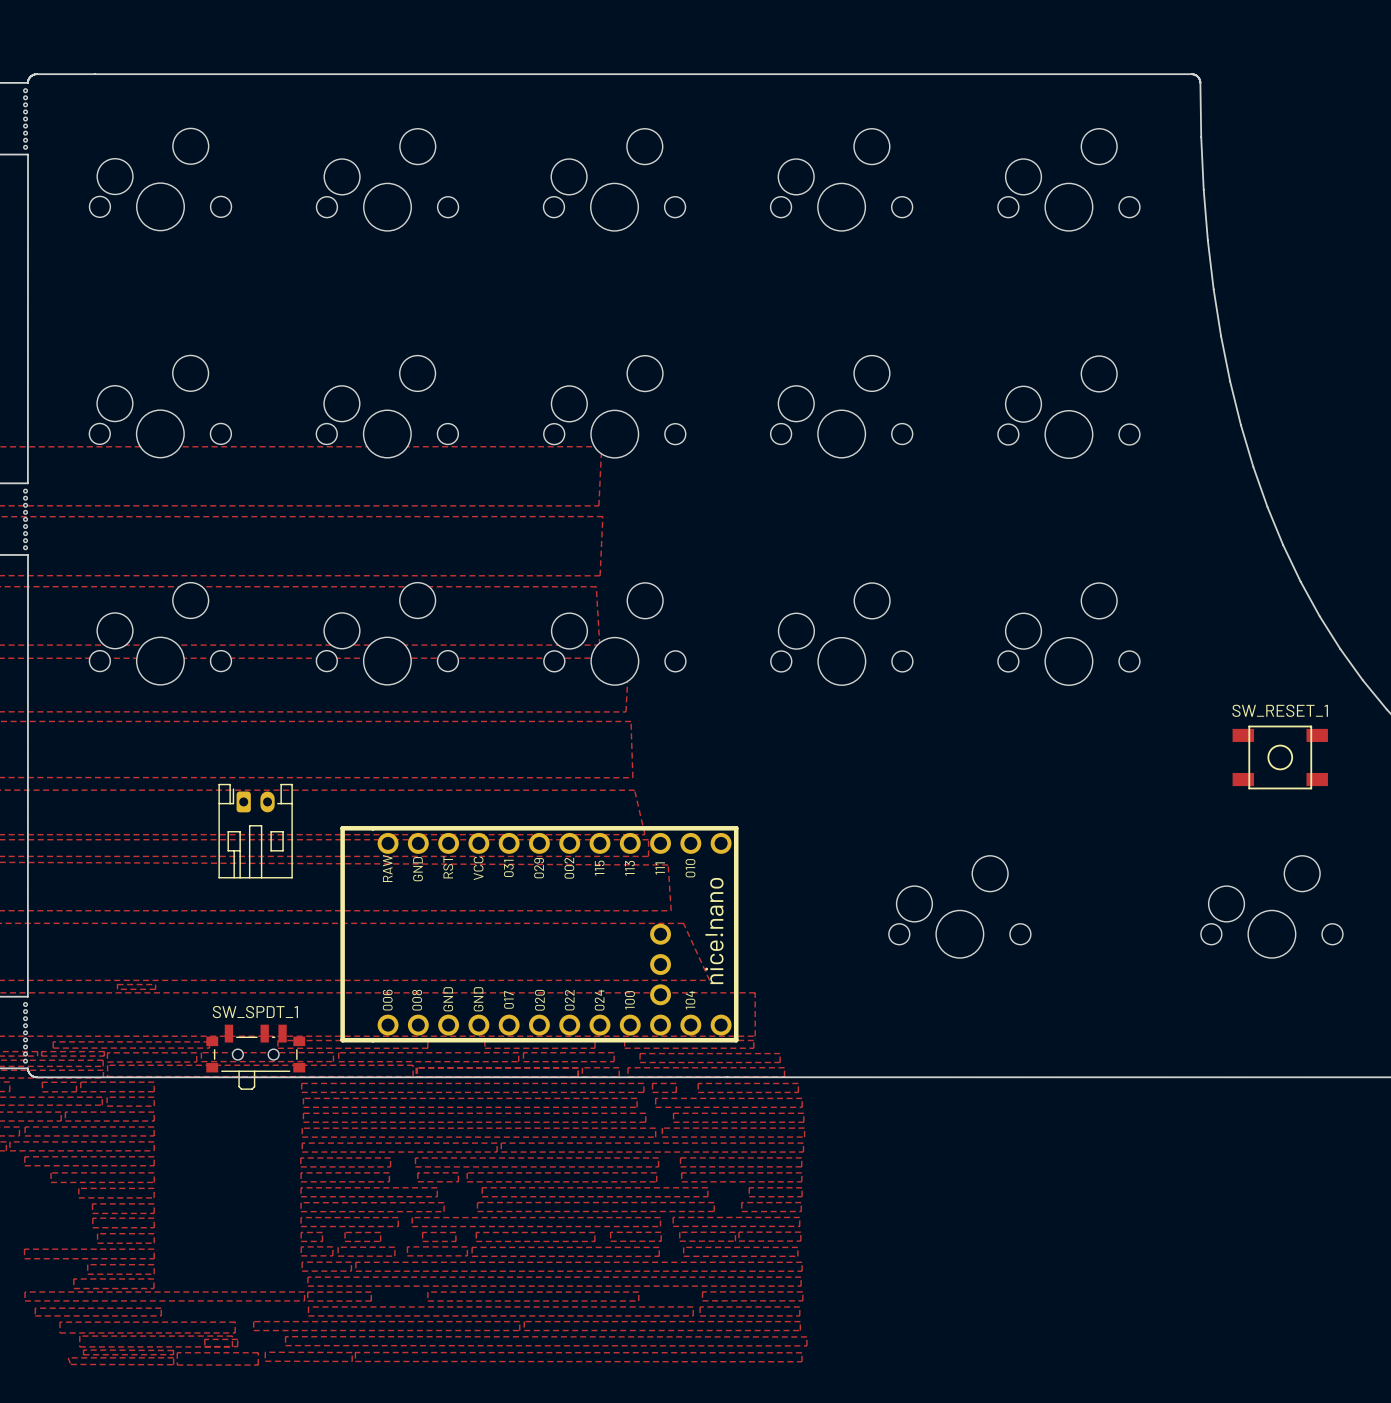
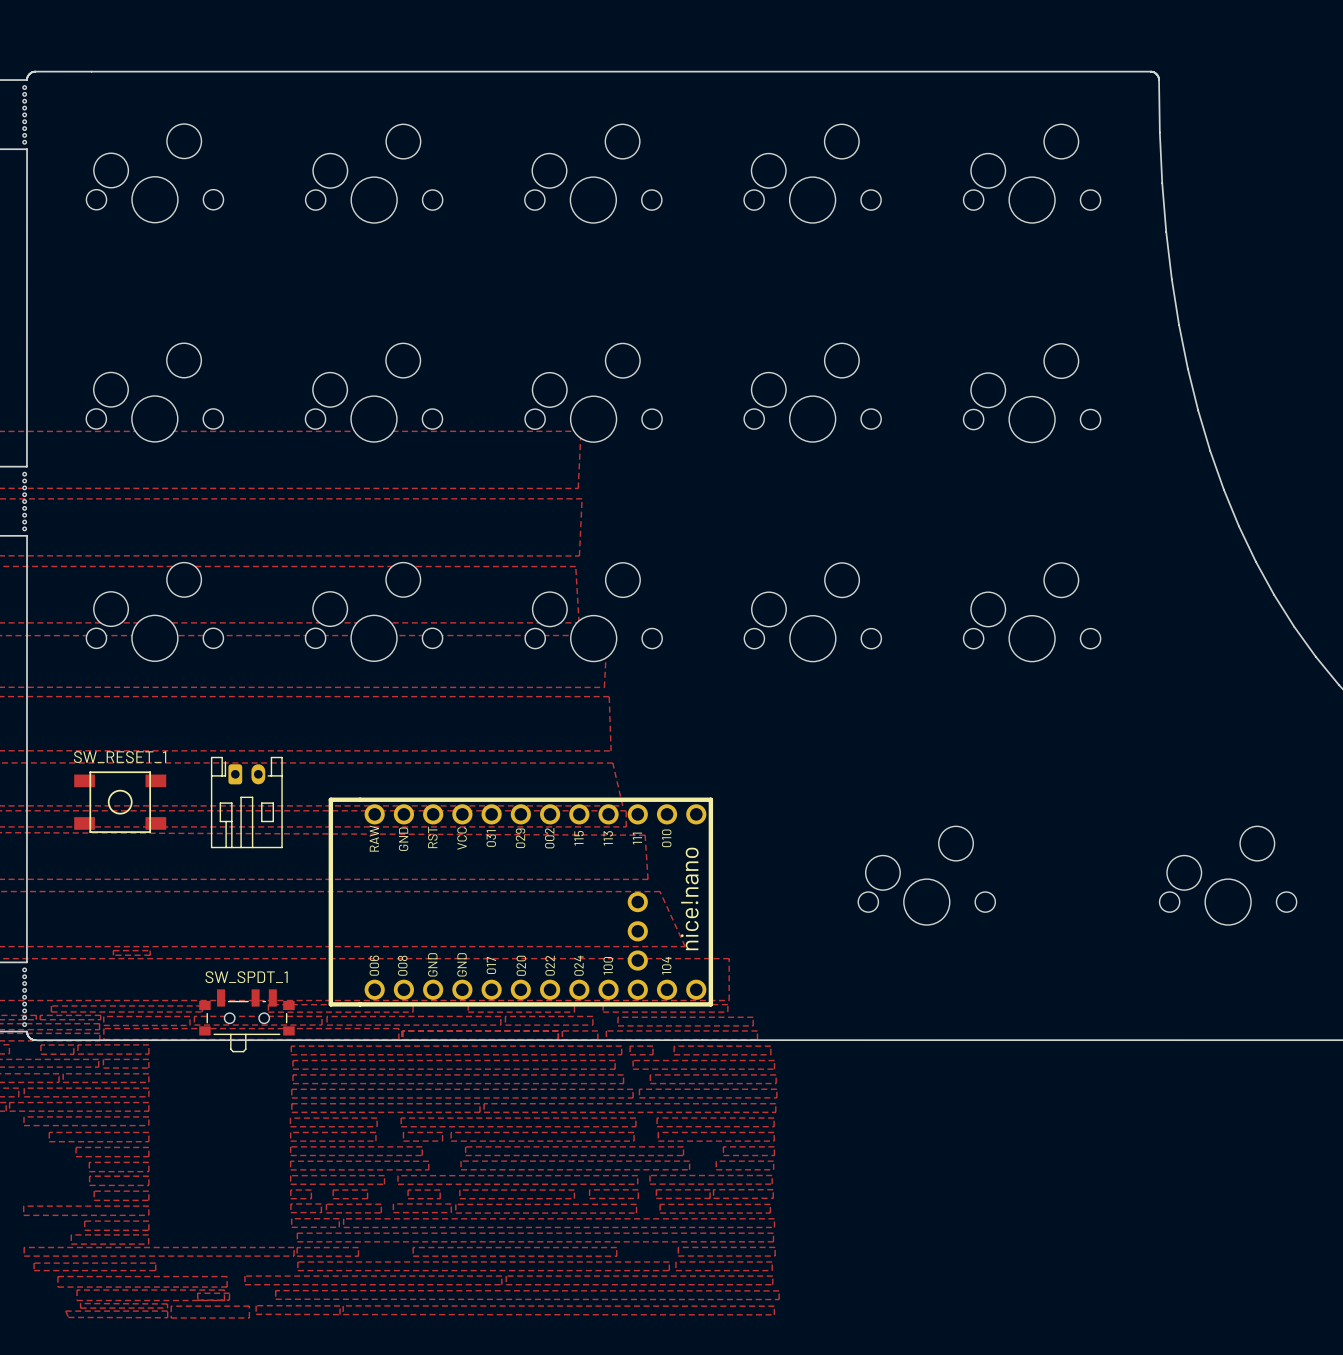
SW_RESET_1 position: (1280, 757) -> (120, 802)

